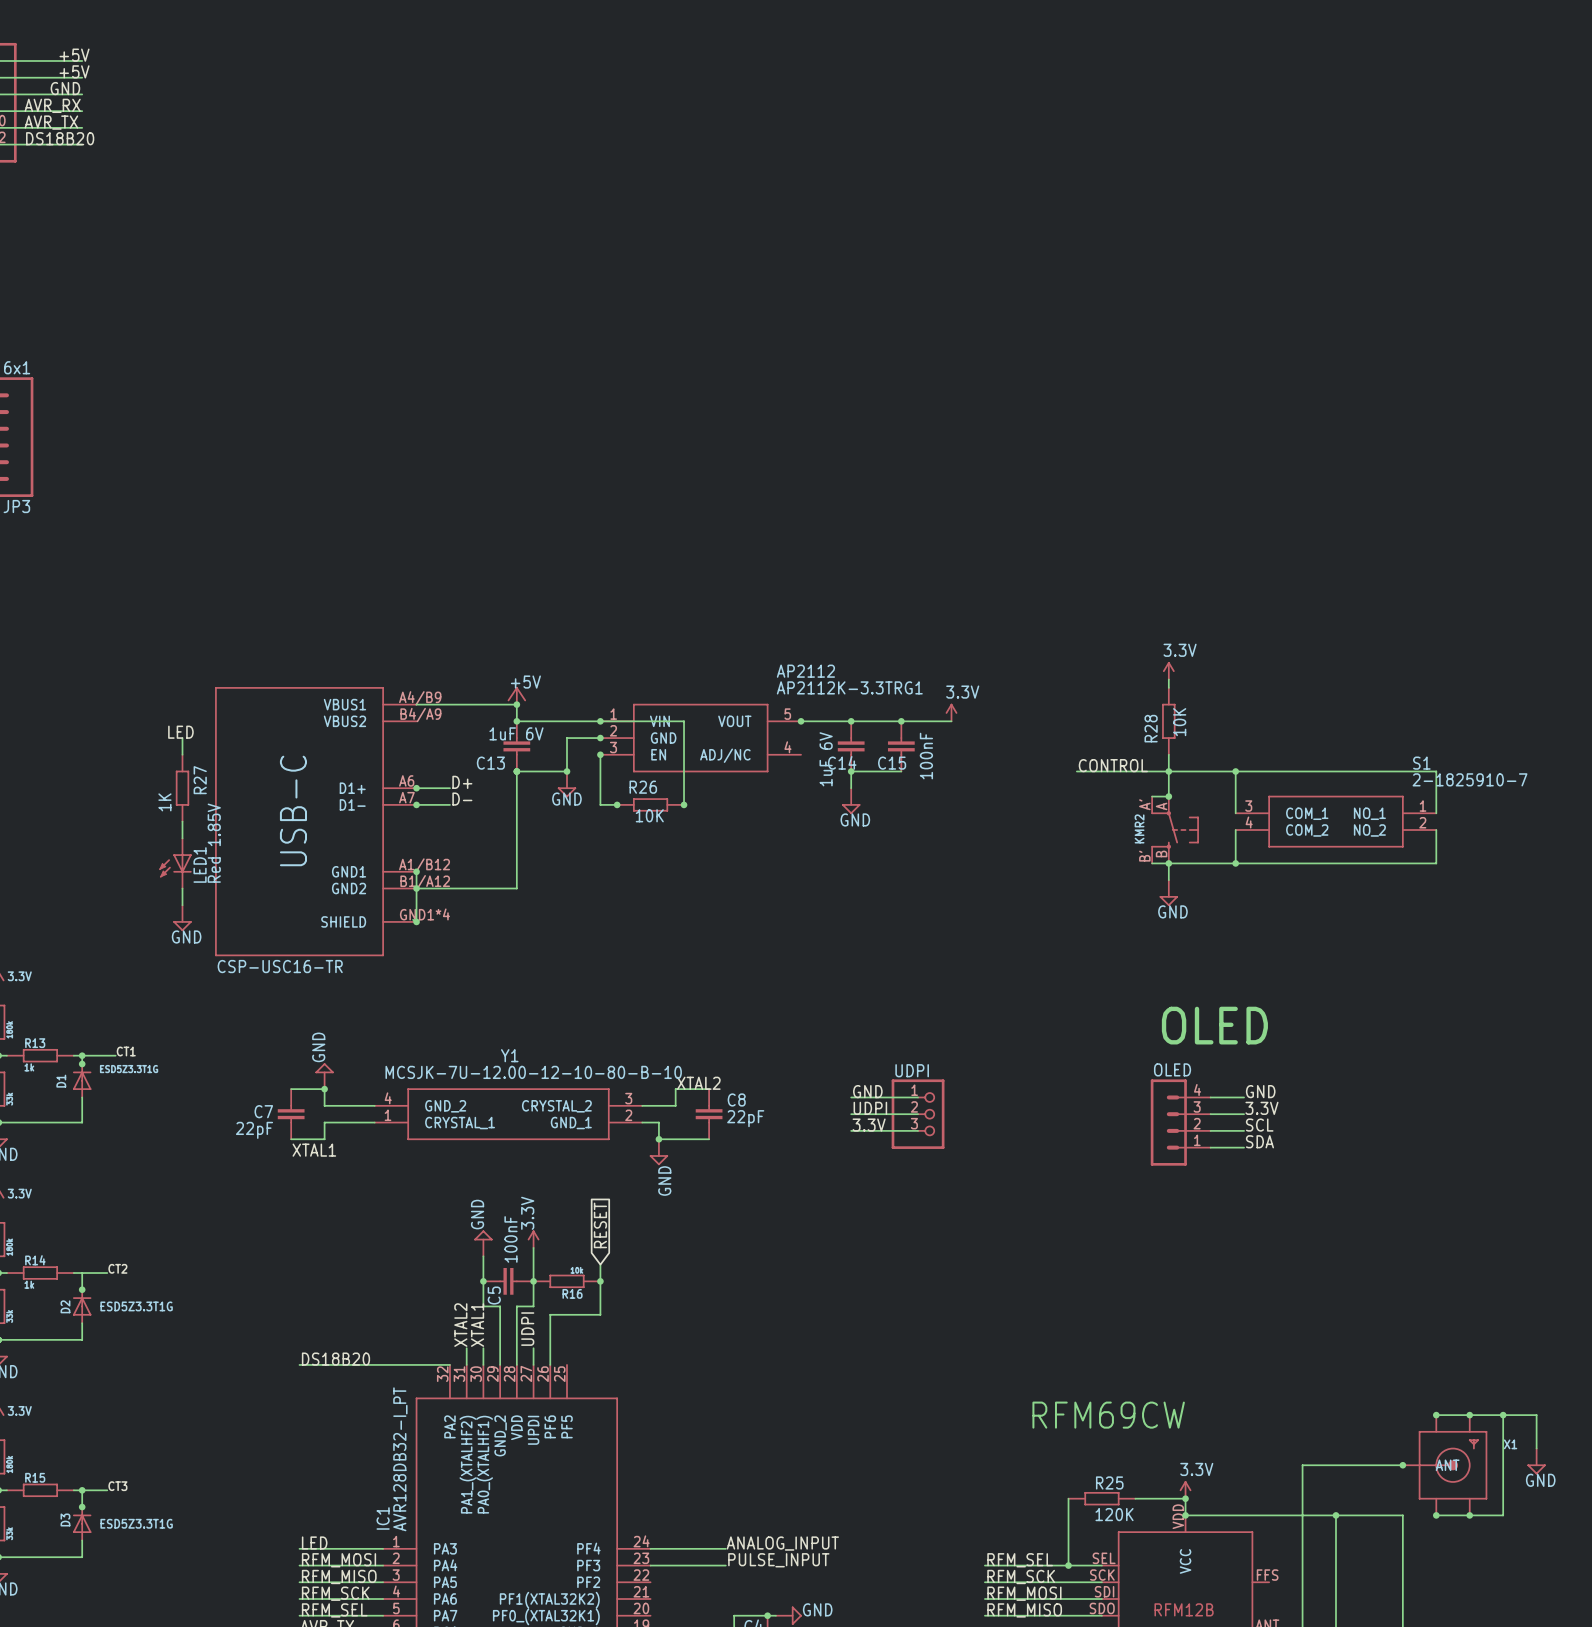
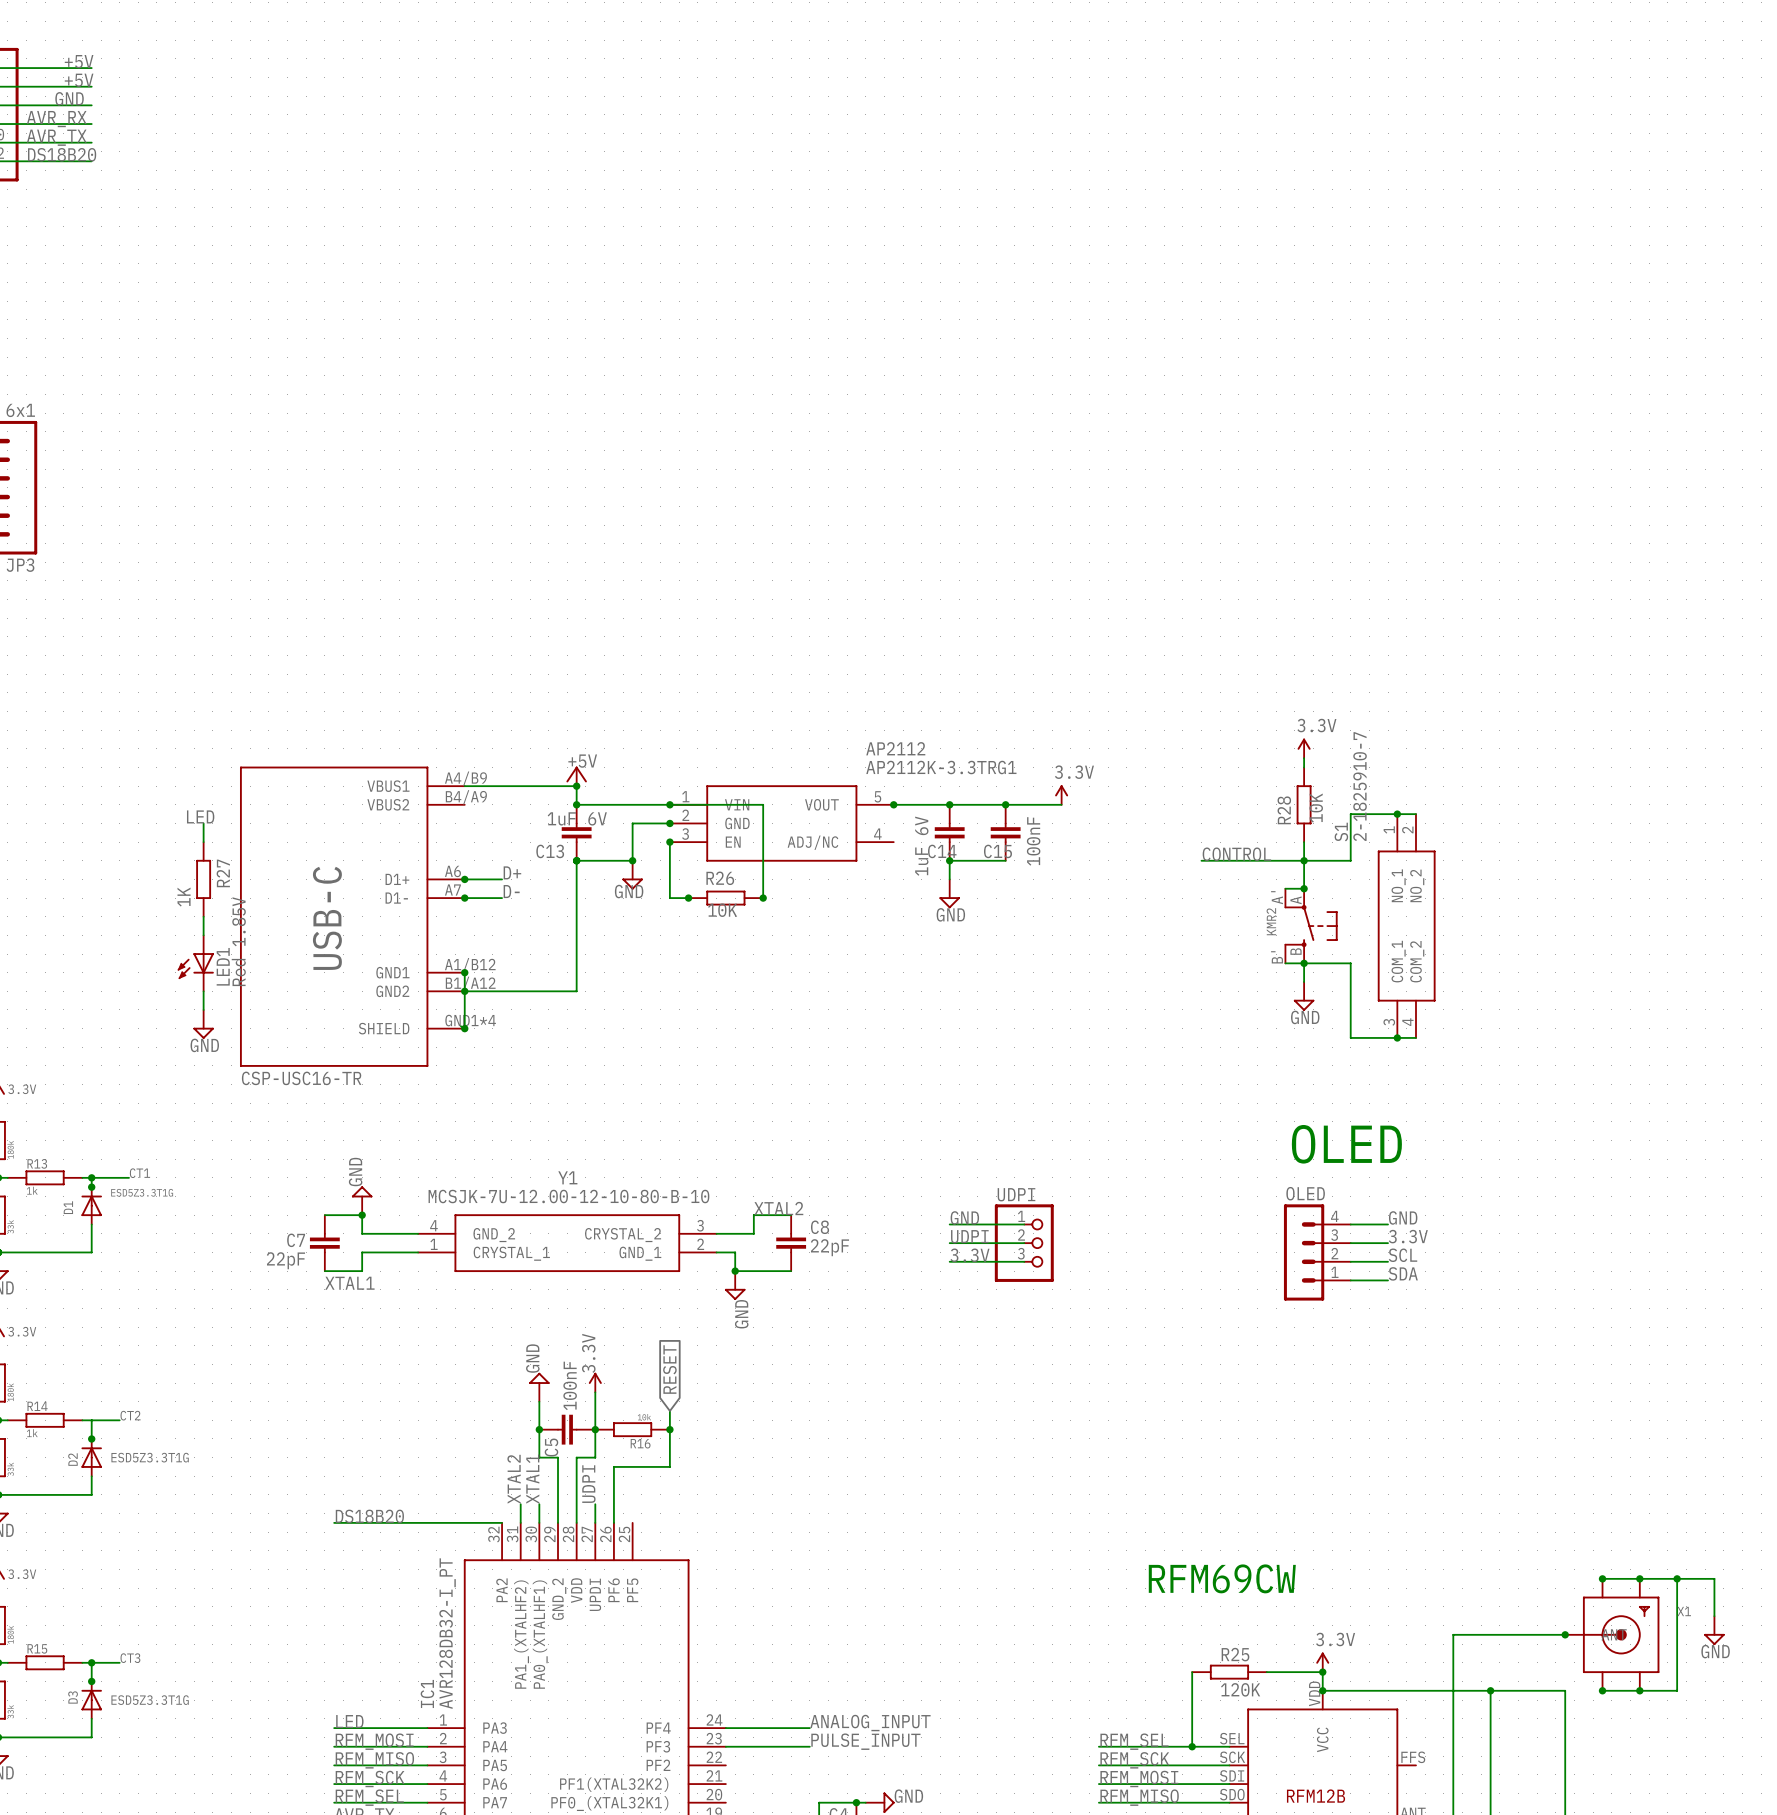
junction: none -> (1397, 814)
wire: (1210, 771) (1436, 771) (1436, 813) -> (1350, 860) (1350, 814) (1416, 814)
junction: (1235, 771) -> none
S1 rotation: 0° (1335, 821) -> 90° counterclockwise (1406, 926)
wire: (1436, 829) (1436, 863) (1210, 863) -> (1416, 1037) (1350, 1037) (1350, 963)
junction: (1235, 863) -> none
junction: none -> (1397, 1037)

